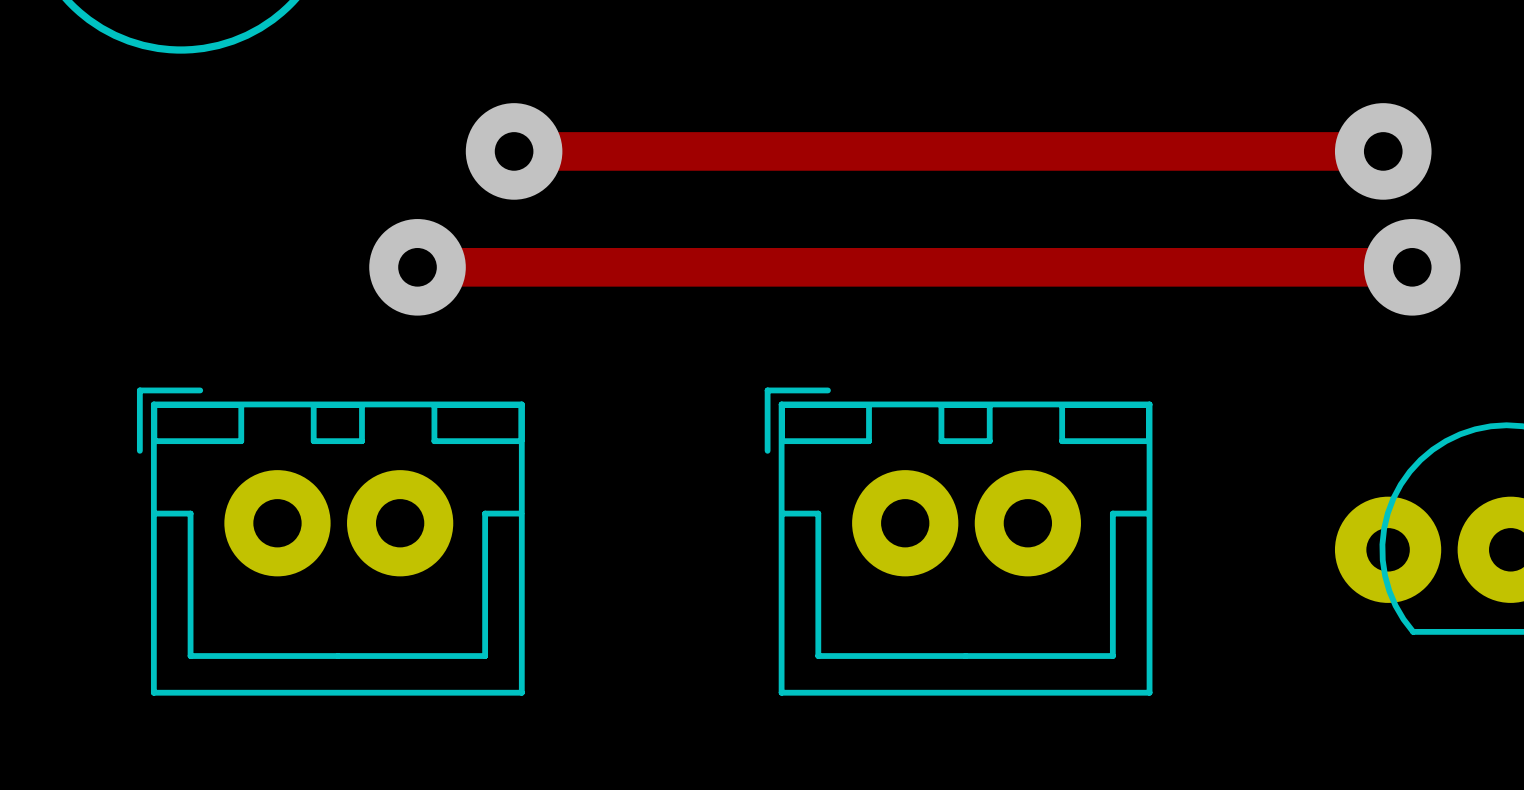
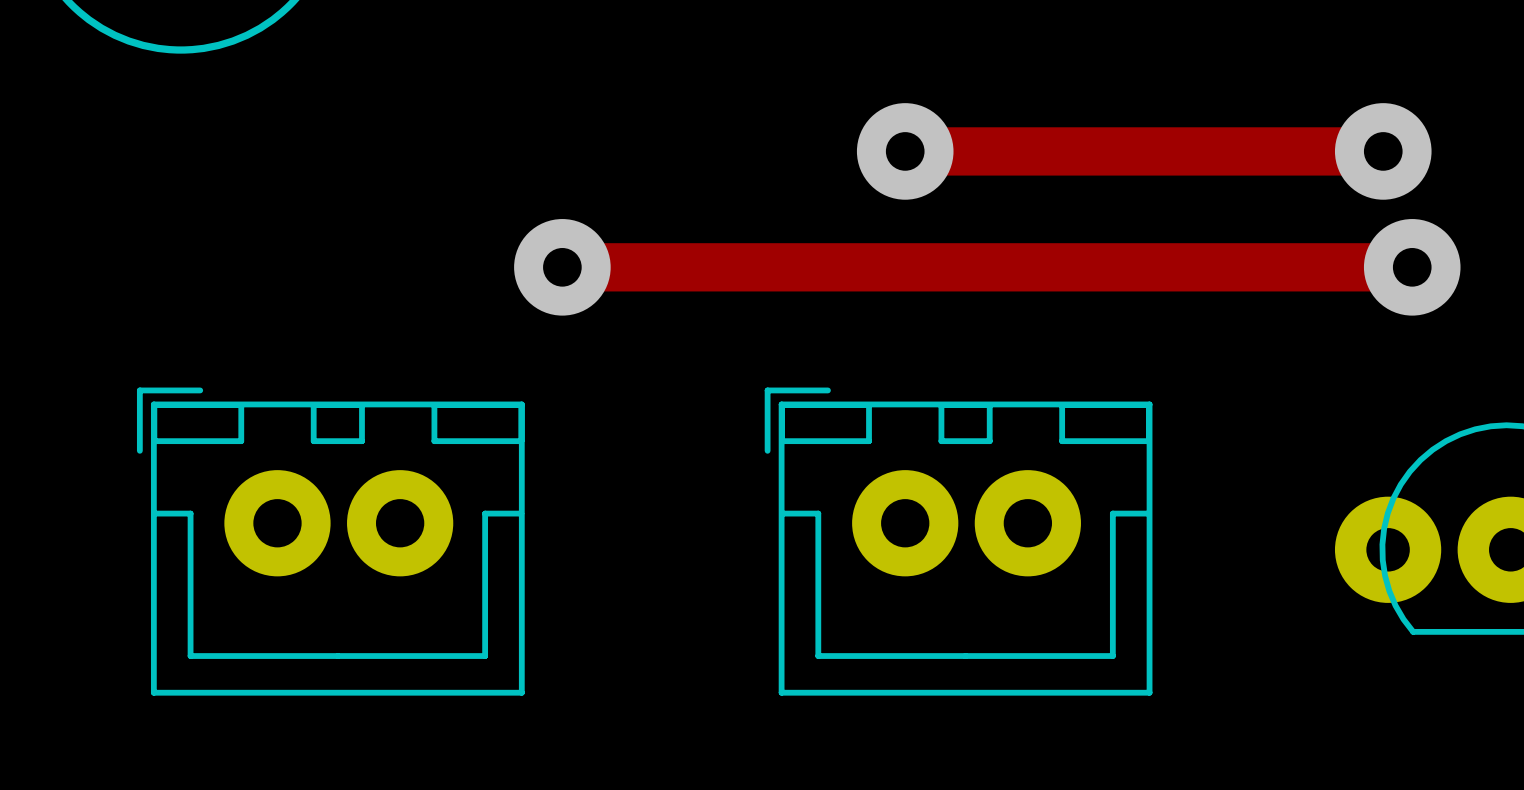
track: (514, 151) (905, 151) -> none
via: (514, 151) -> none
track width: thin (905, 151) (1383, 151) -> thick (905, 151) (1383, 151)
via: none -> (905, 151)
track: (417, 267) (562, 267) -> none
via: (417, 267) -> none
track width: thin (562, 267) (1412, 267) -> thick (562, 267) (1412, 267)
via: none -> (562, 267)

